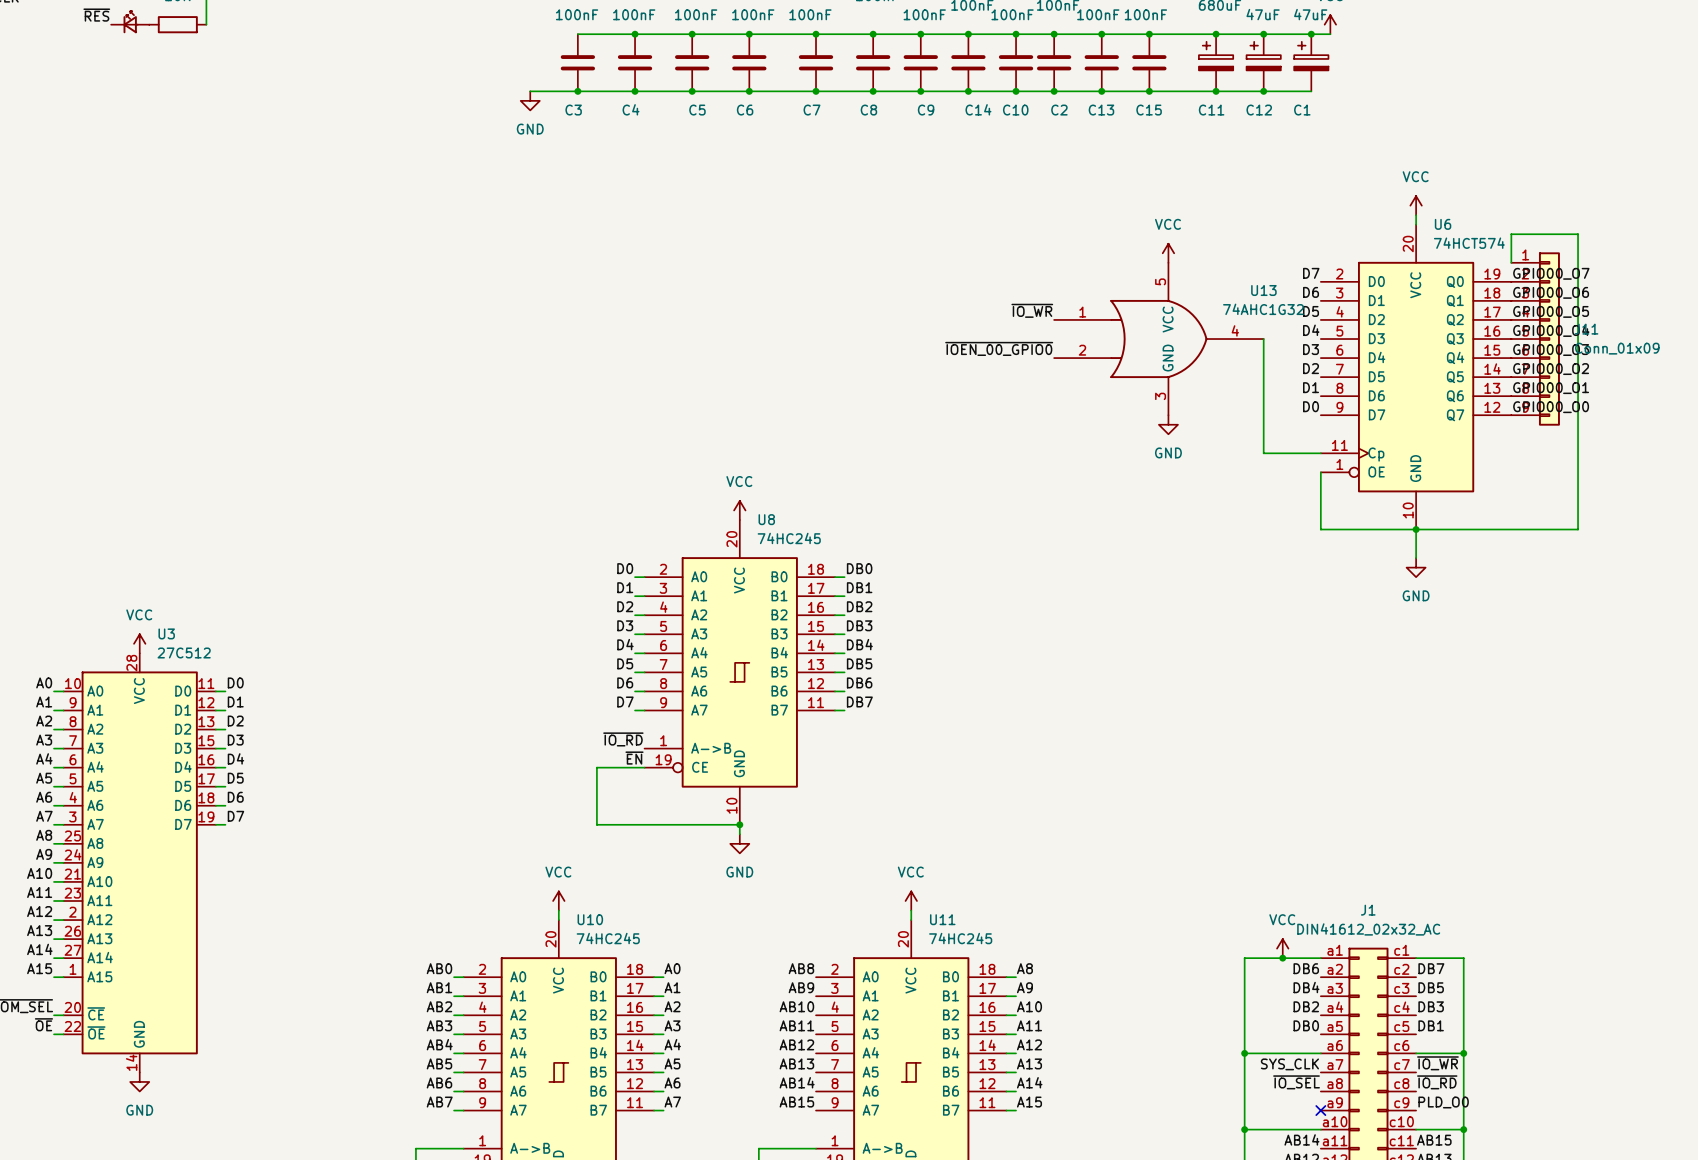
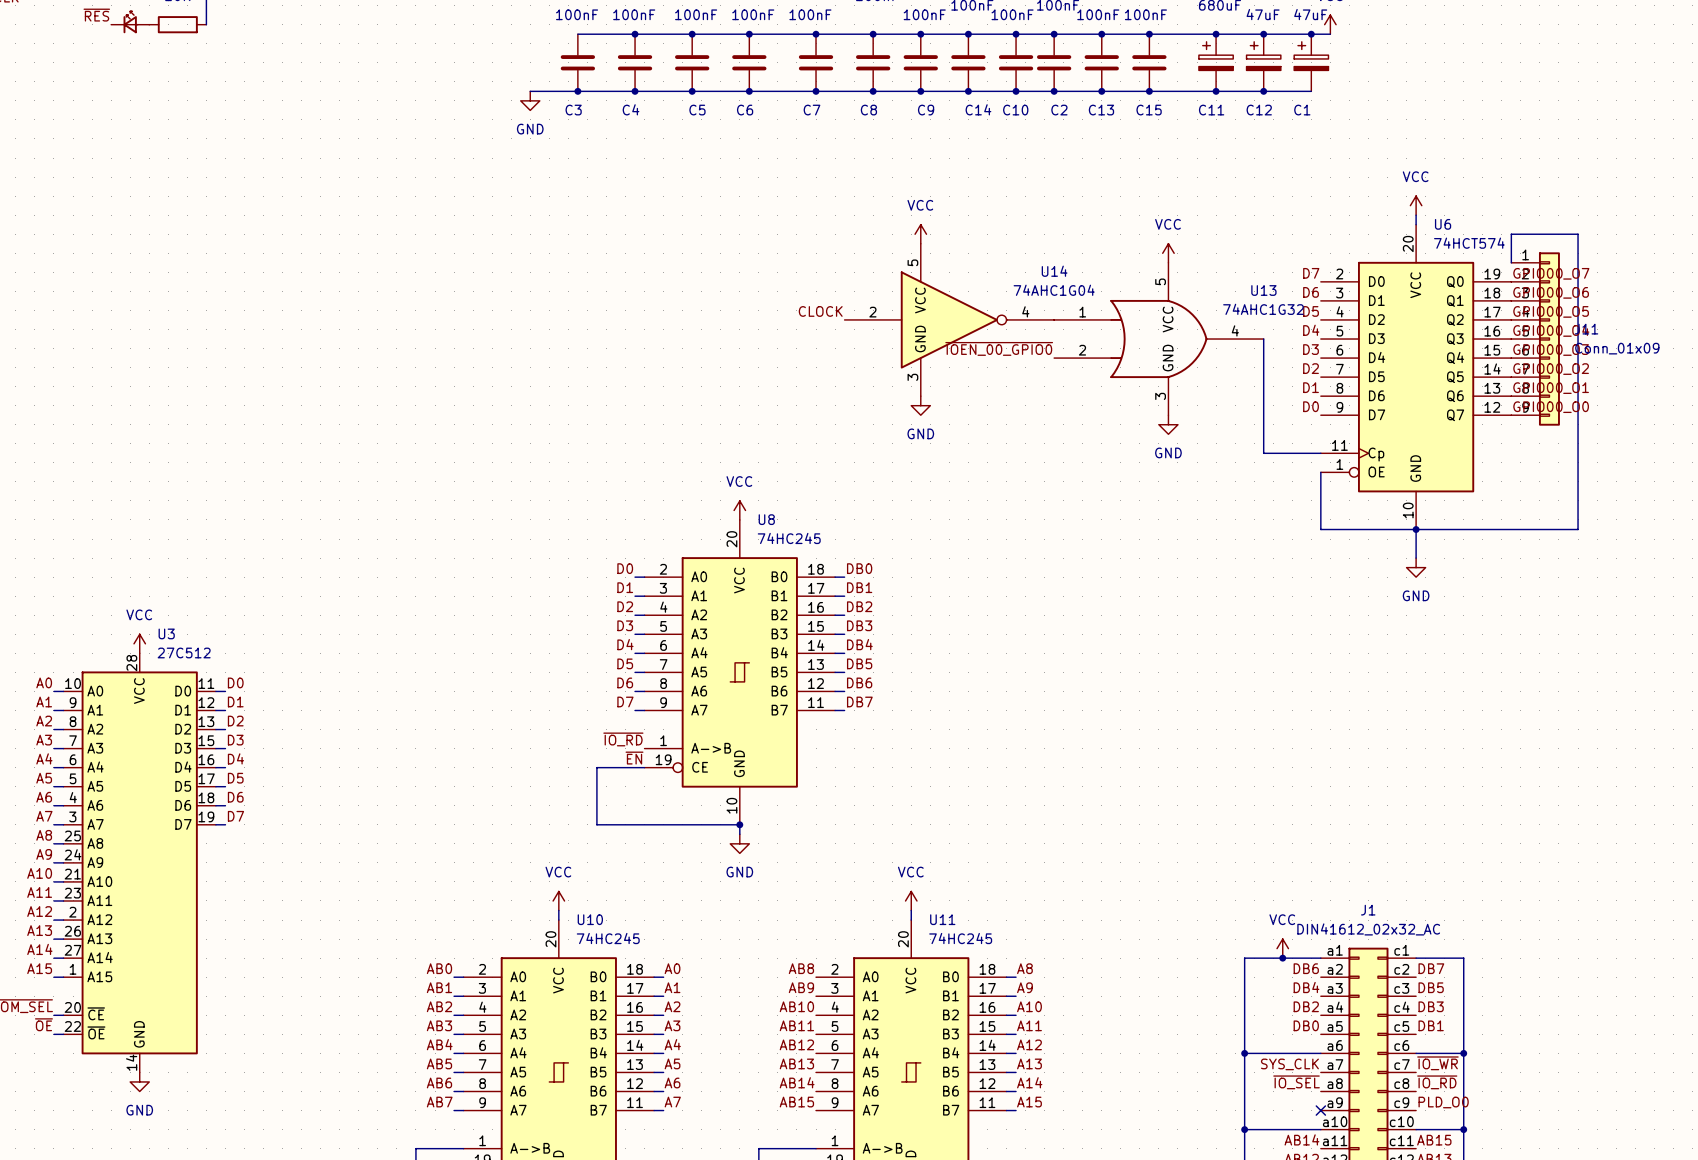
power symbol: none -> VCC (920, 234)
label: ~{IO_WR} (1032, 310) -> none
label: none -> CLOCK (820, 311)
U14: none -> 74AHC1G04 (949, 319)
power symbol: none -> GND (920, 405)

